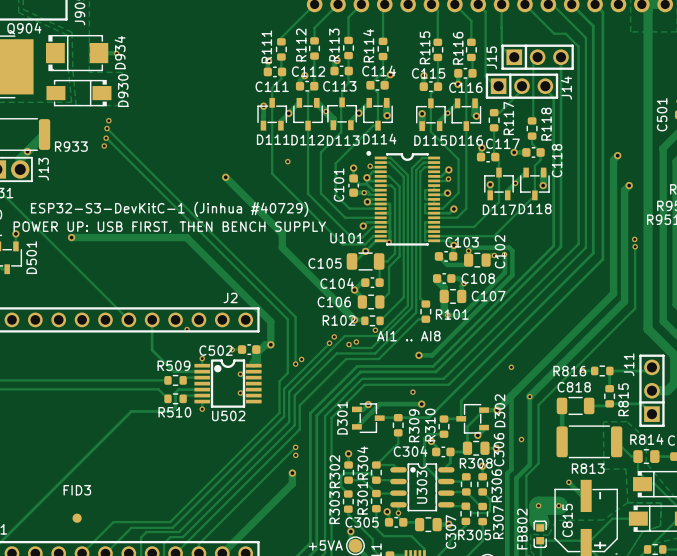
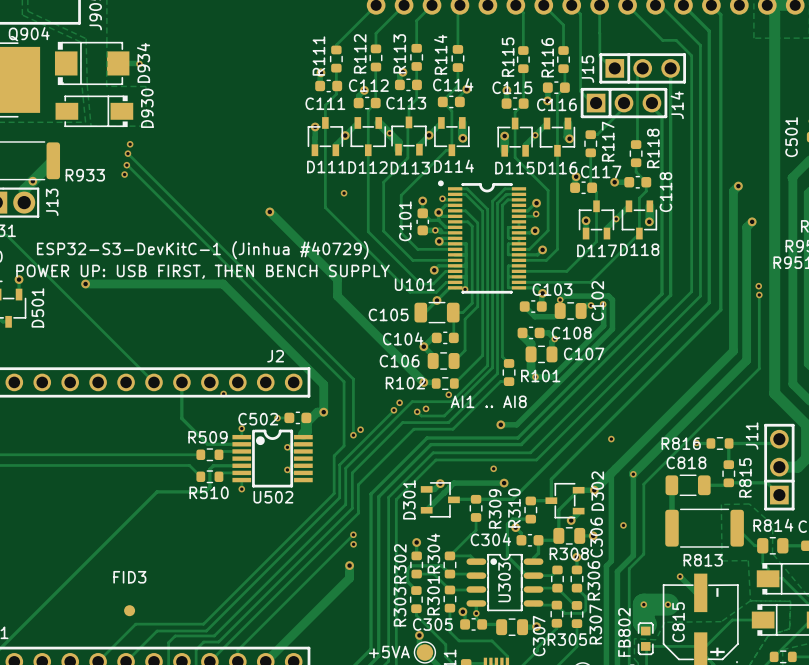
FID3 position: (77, 518) -> (129, 610)

